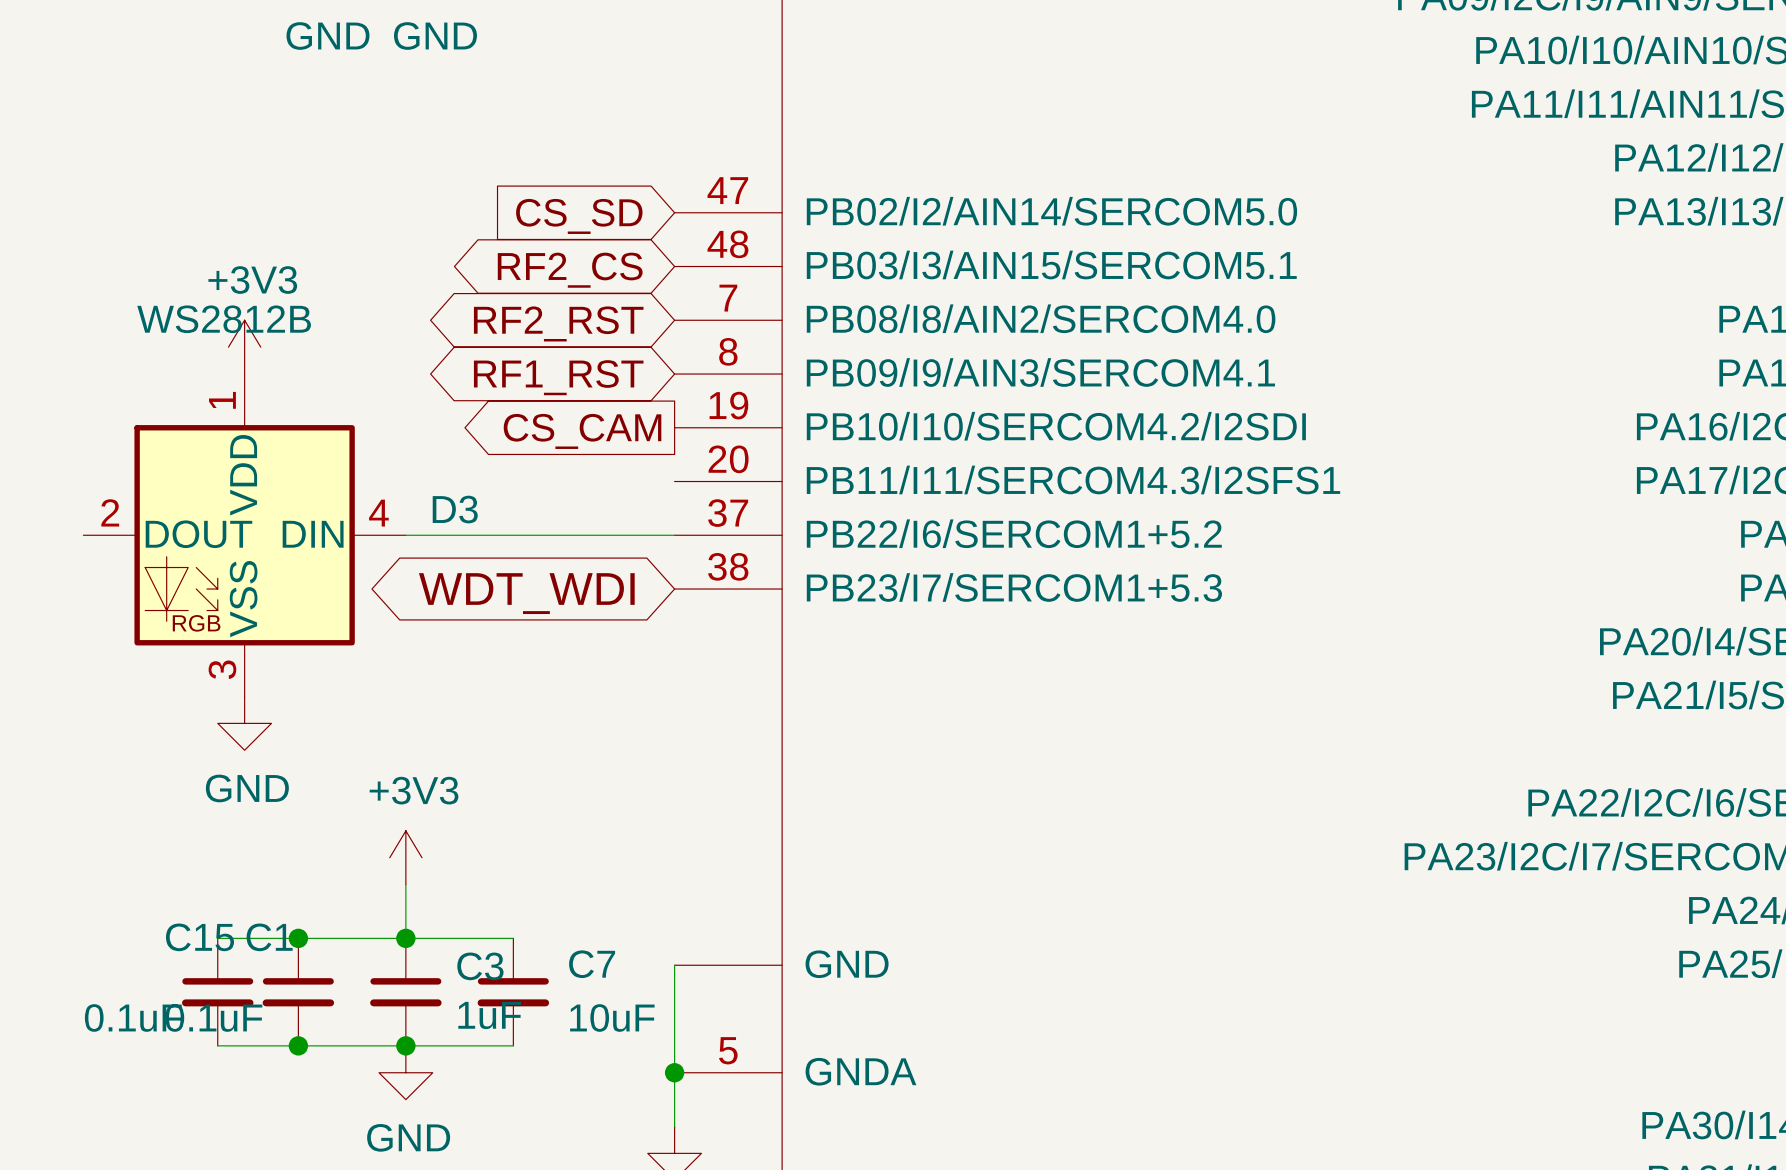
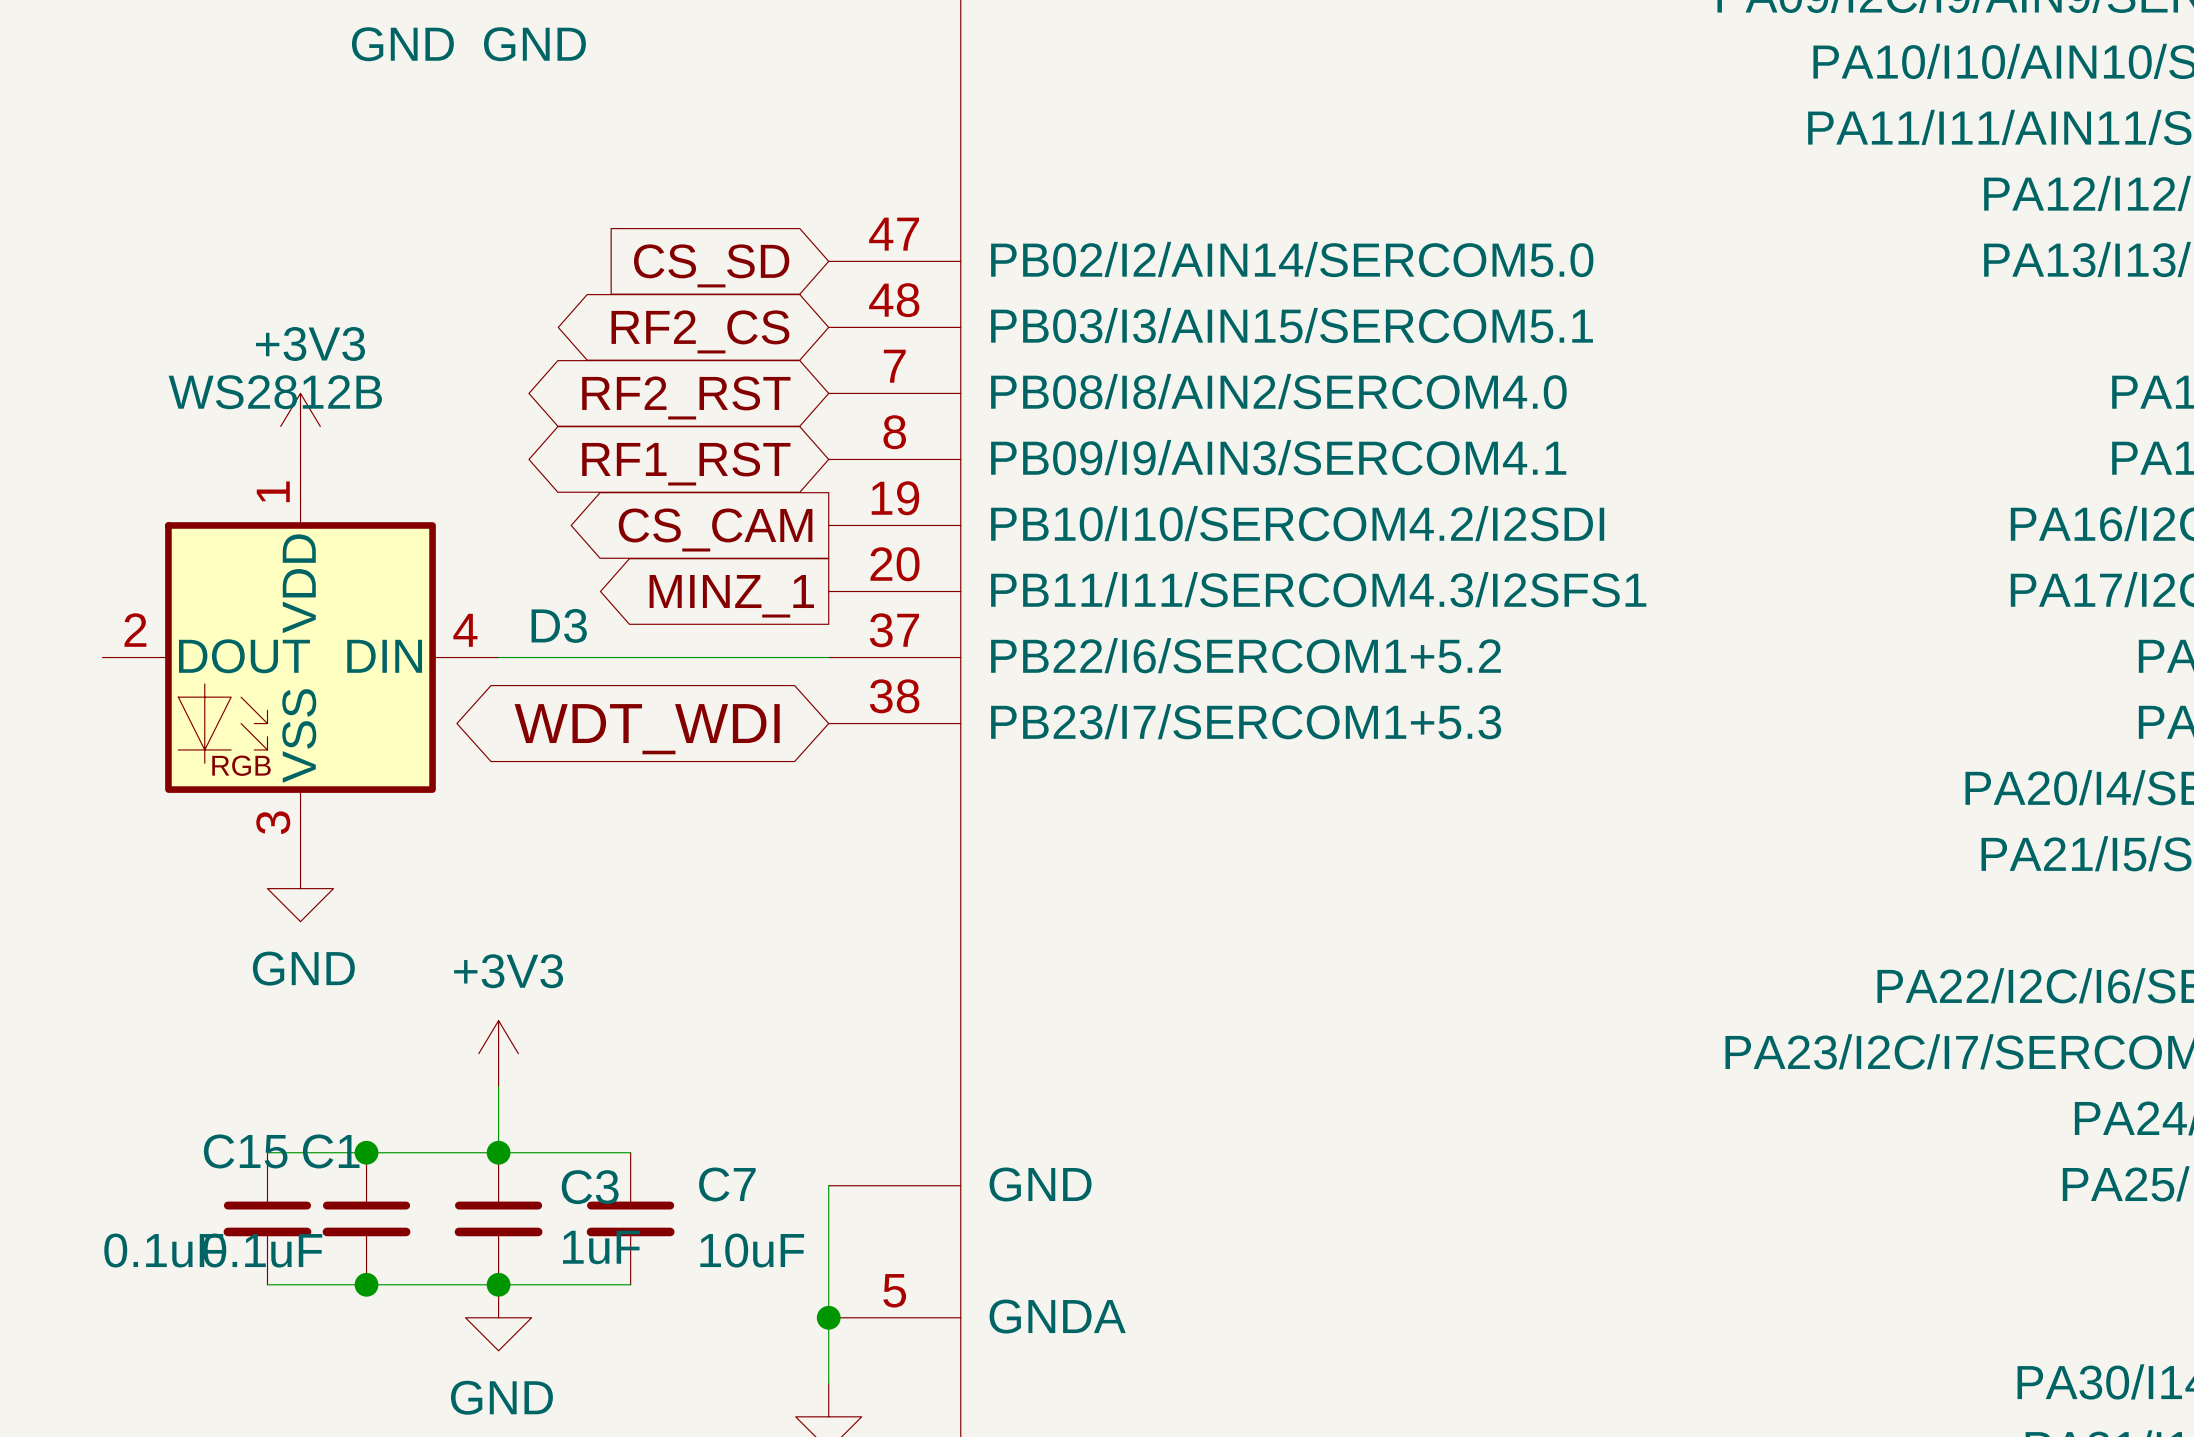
global label: none -> MINZ_1 (731, 596)

